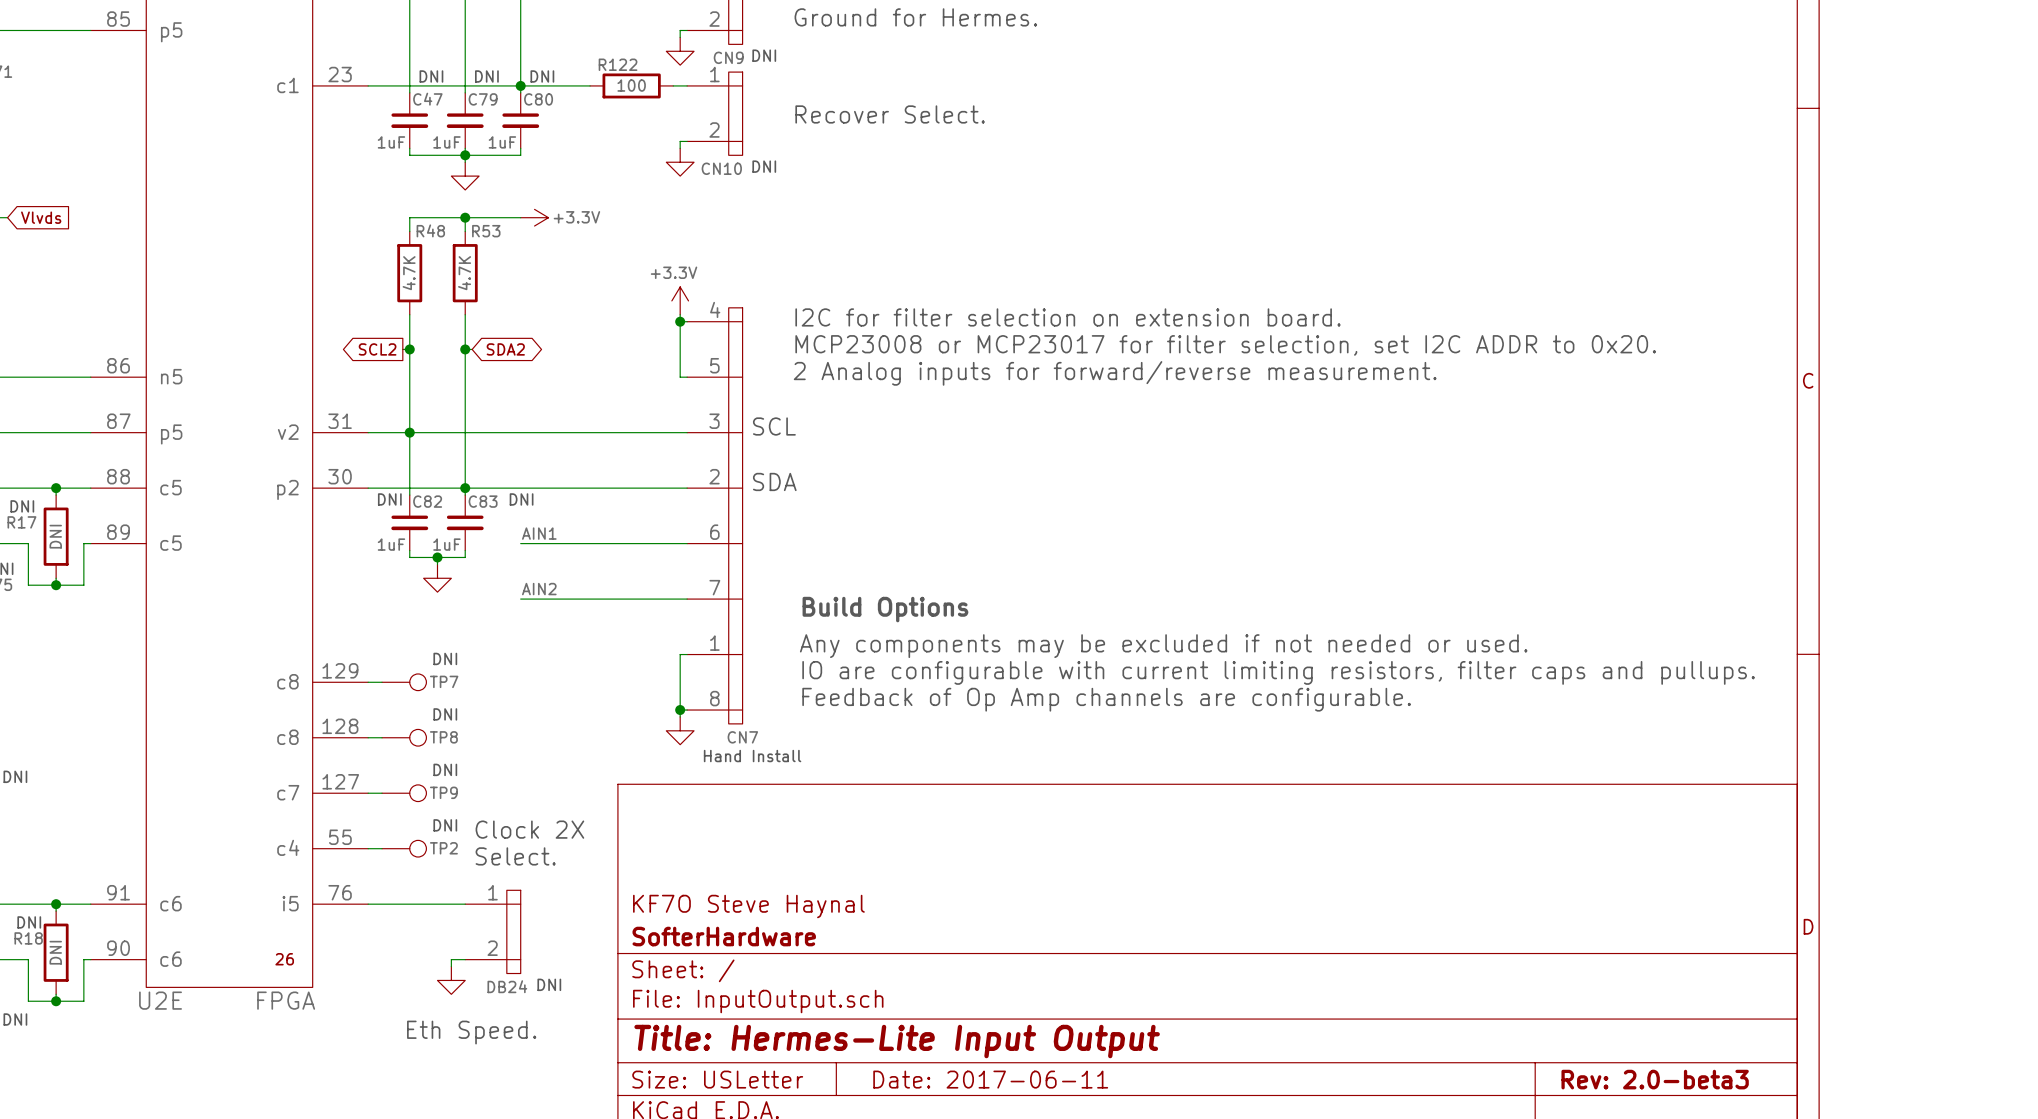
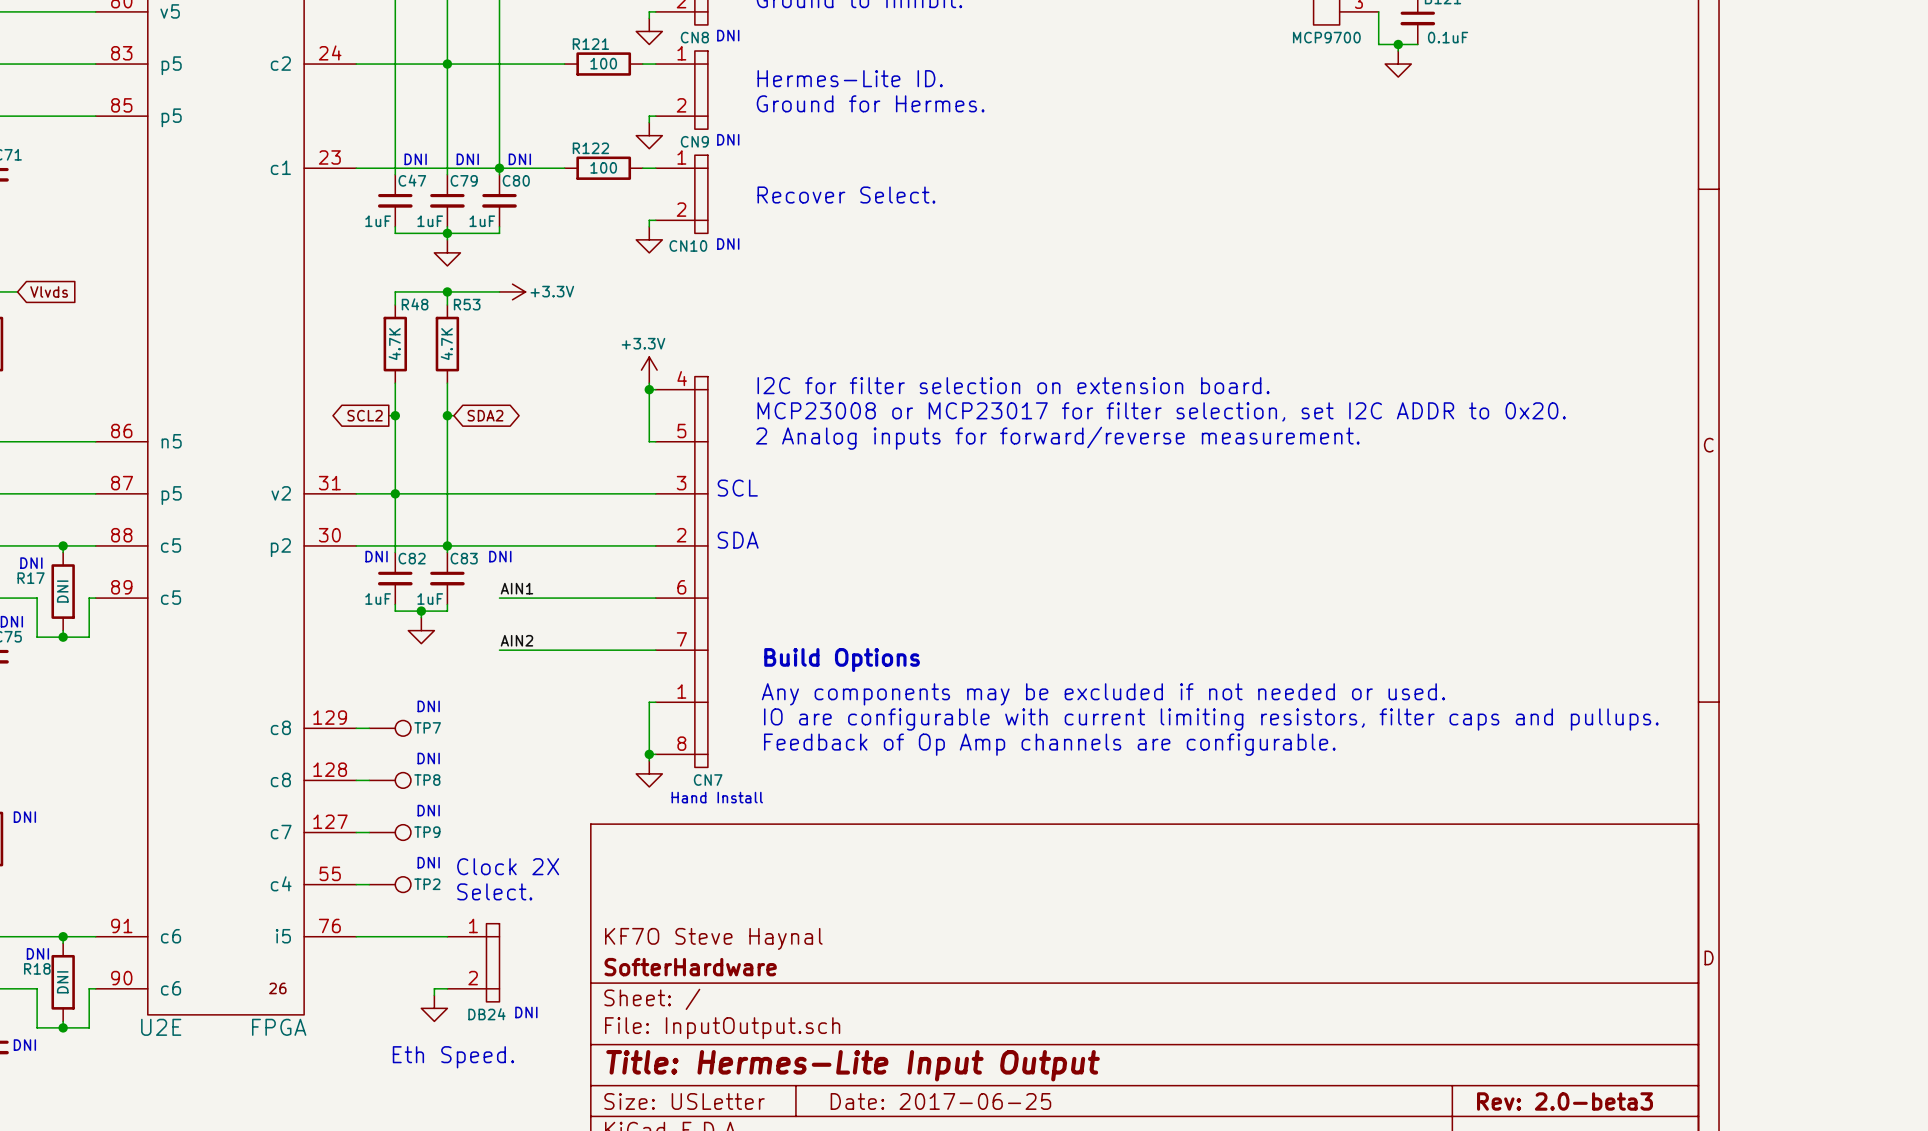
title block: Date: 2017-06-11 (990, 1079) -> Date: 2017-06-25 (940, 1101)

